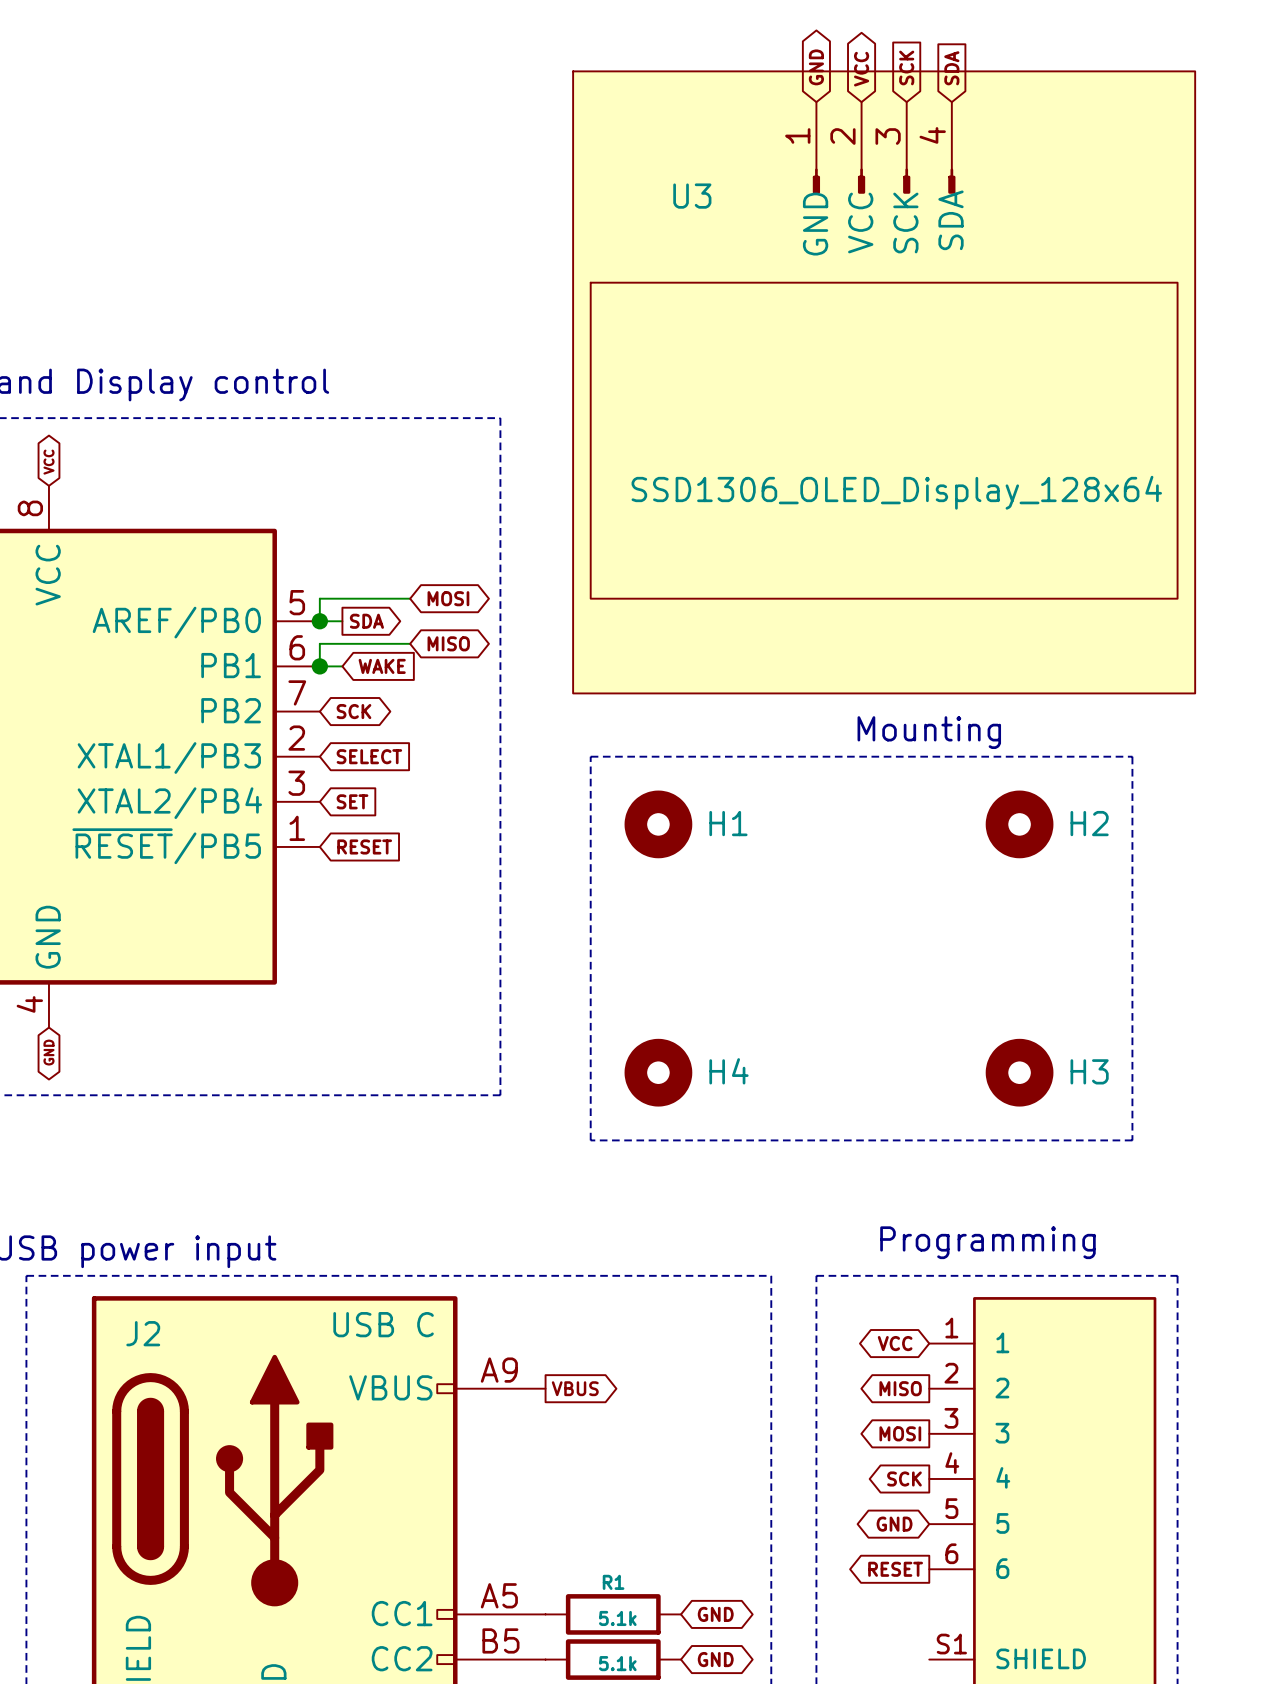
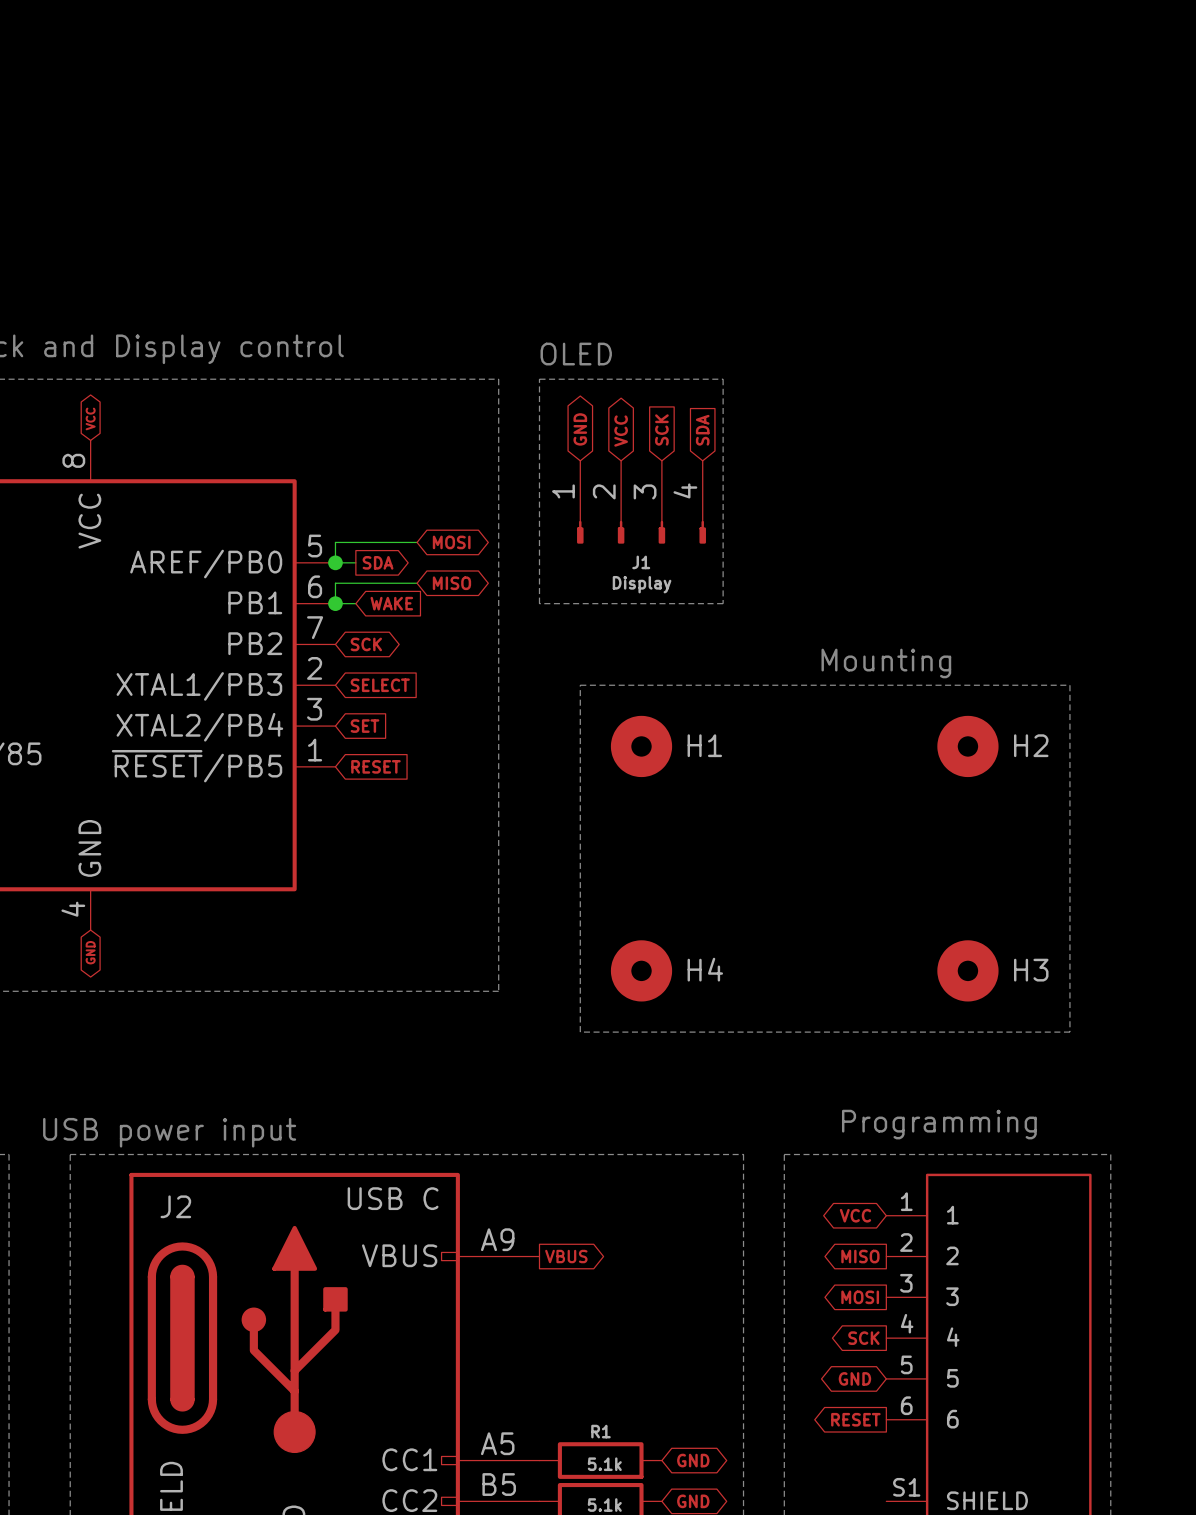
global label: GND (816, 67) -> none
global label: SCK (906, 67) -> none
global label: SDA (951, 68) -> none
global label: VCC (861, 69) -> none
U3: SSD1306_OLED_Display_128x64 (884, 382) -> none
text: none -> OLED (576, 354)
line: none -> (539, 379) (723, 379) (723, 603) (539, 603) (539, 379)
global label: none -> GND (580, 429)
global label: none -> SCK (661, 429)
global label: none -> SDA (702, 430)
global label: none -> VCC (621, 431)
J1: none -> Display (641, 502)

